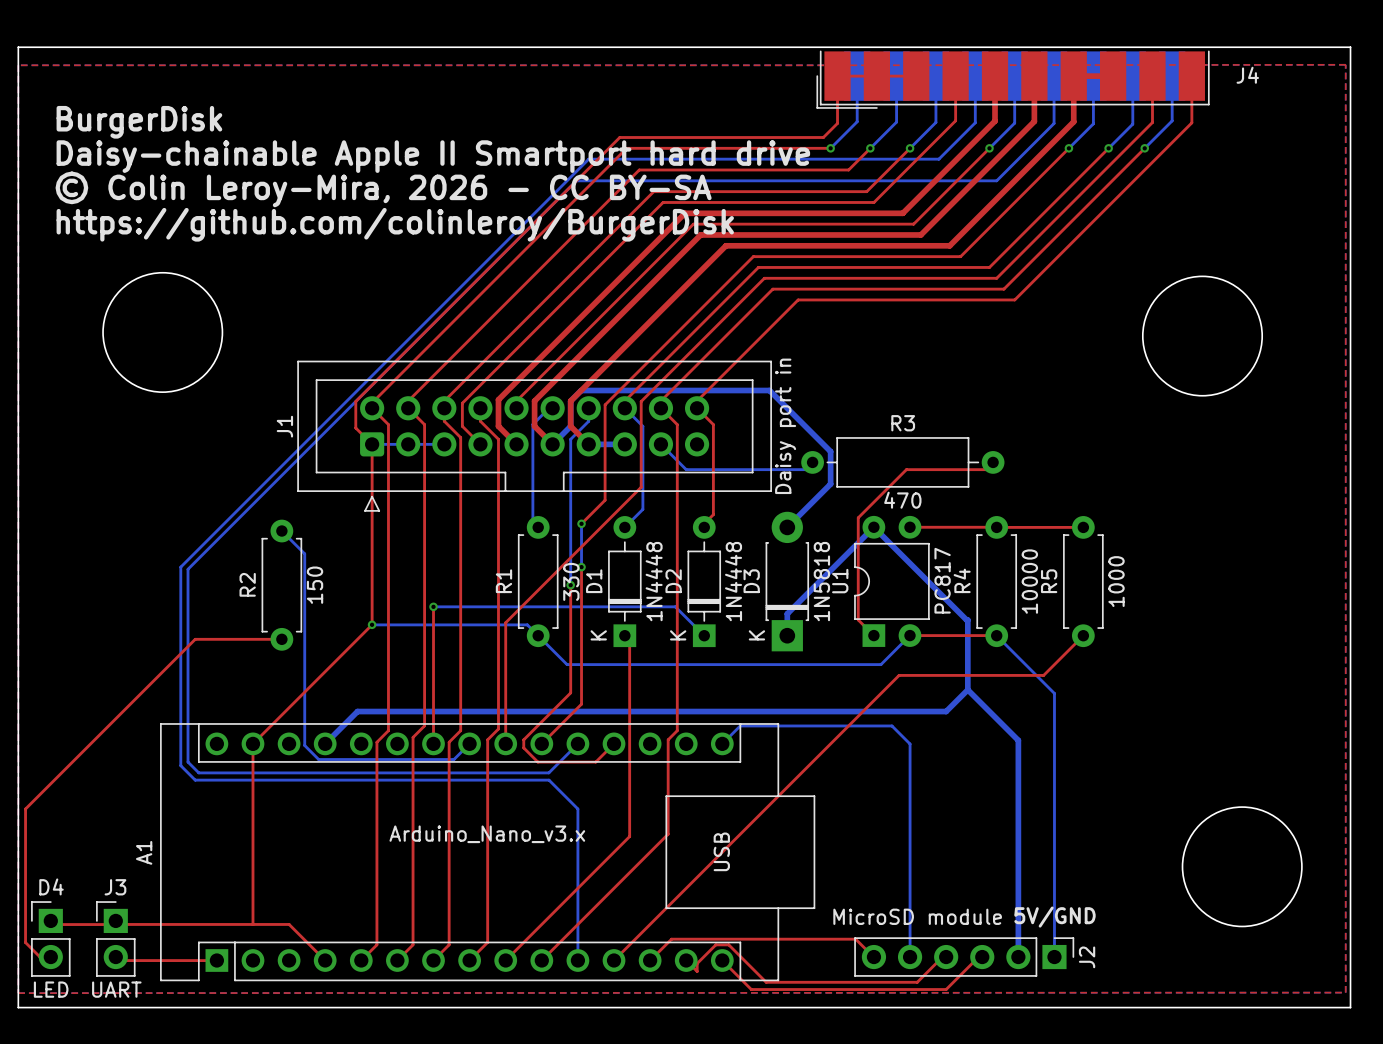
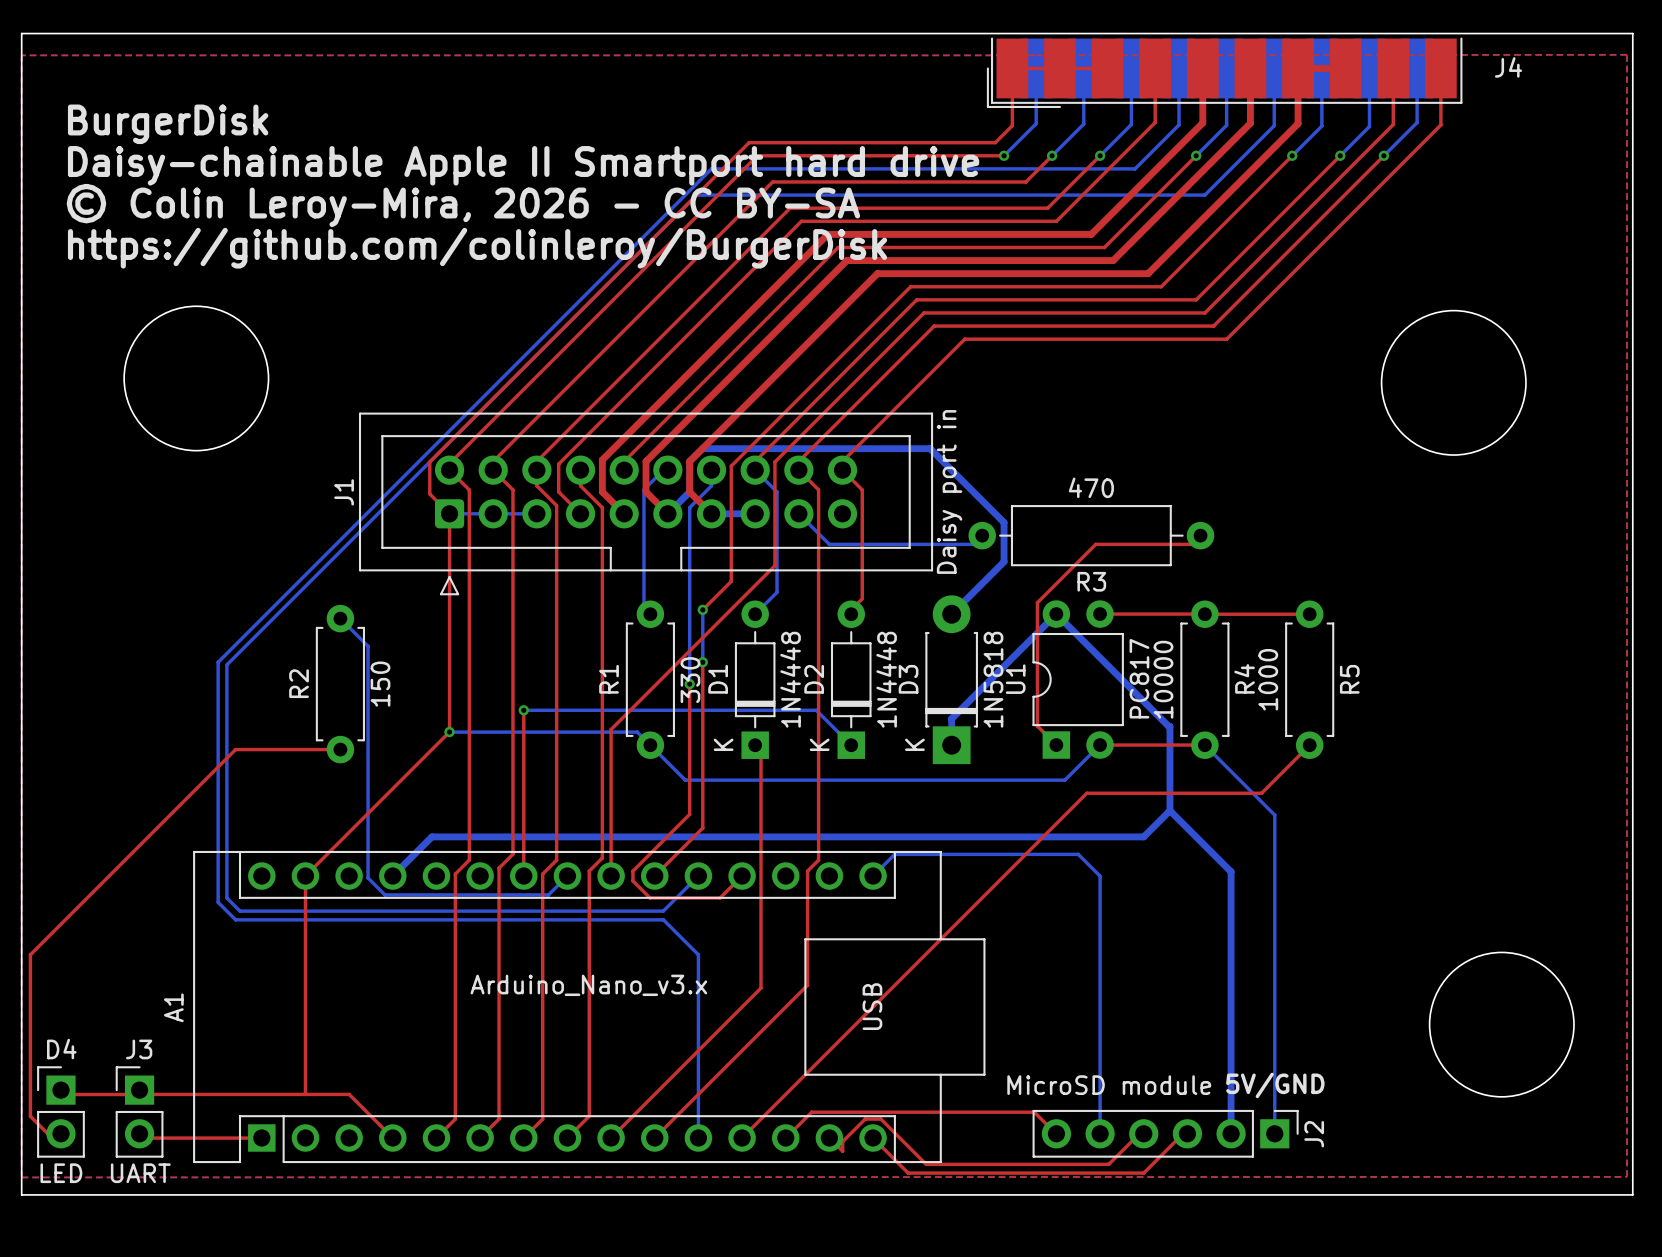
R3 name position: R3 (903, 423) -> R3 (1091, 581)
R3 value position: 470 (902, 500) -> 470 (1091, 487)
R4 name position: R4 (962, 580) -> R4 (1244, 678)
R4 value position: 10000 (1029, 581) -> 10000 (1163, 679)
R5 name position: R5 (1049, 581) -> R5 (1349, 679)
R5 value position: 1000 (1116, 581) -> 1000 (1268, 679)

